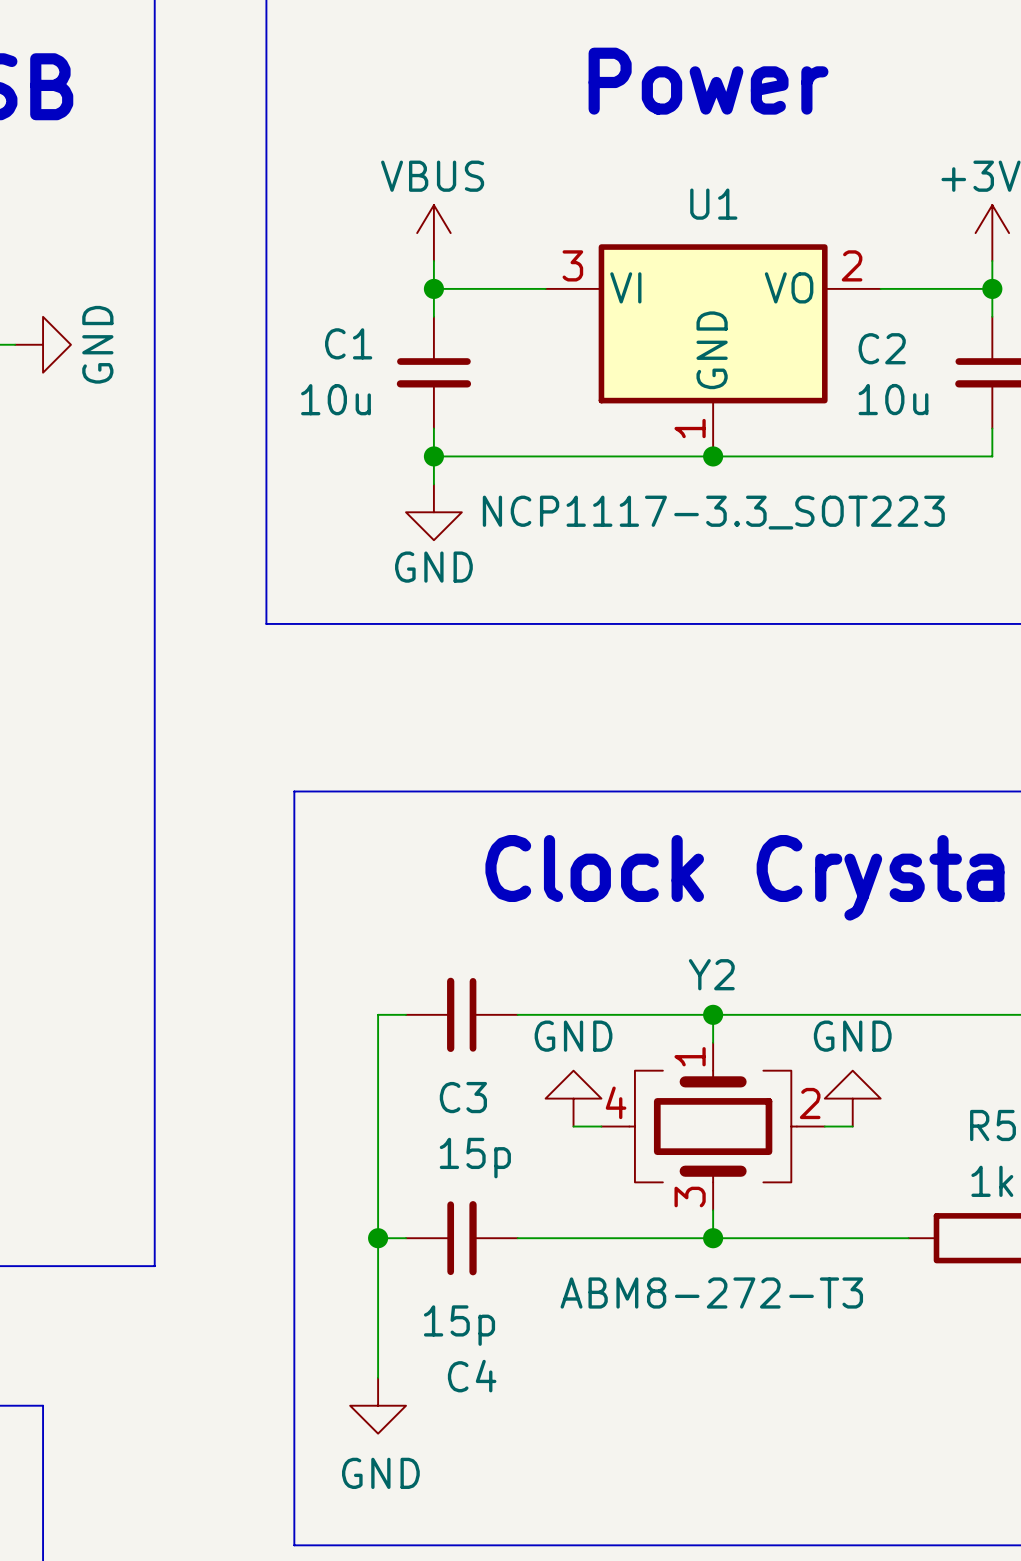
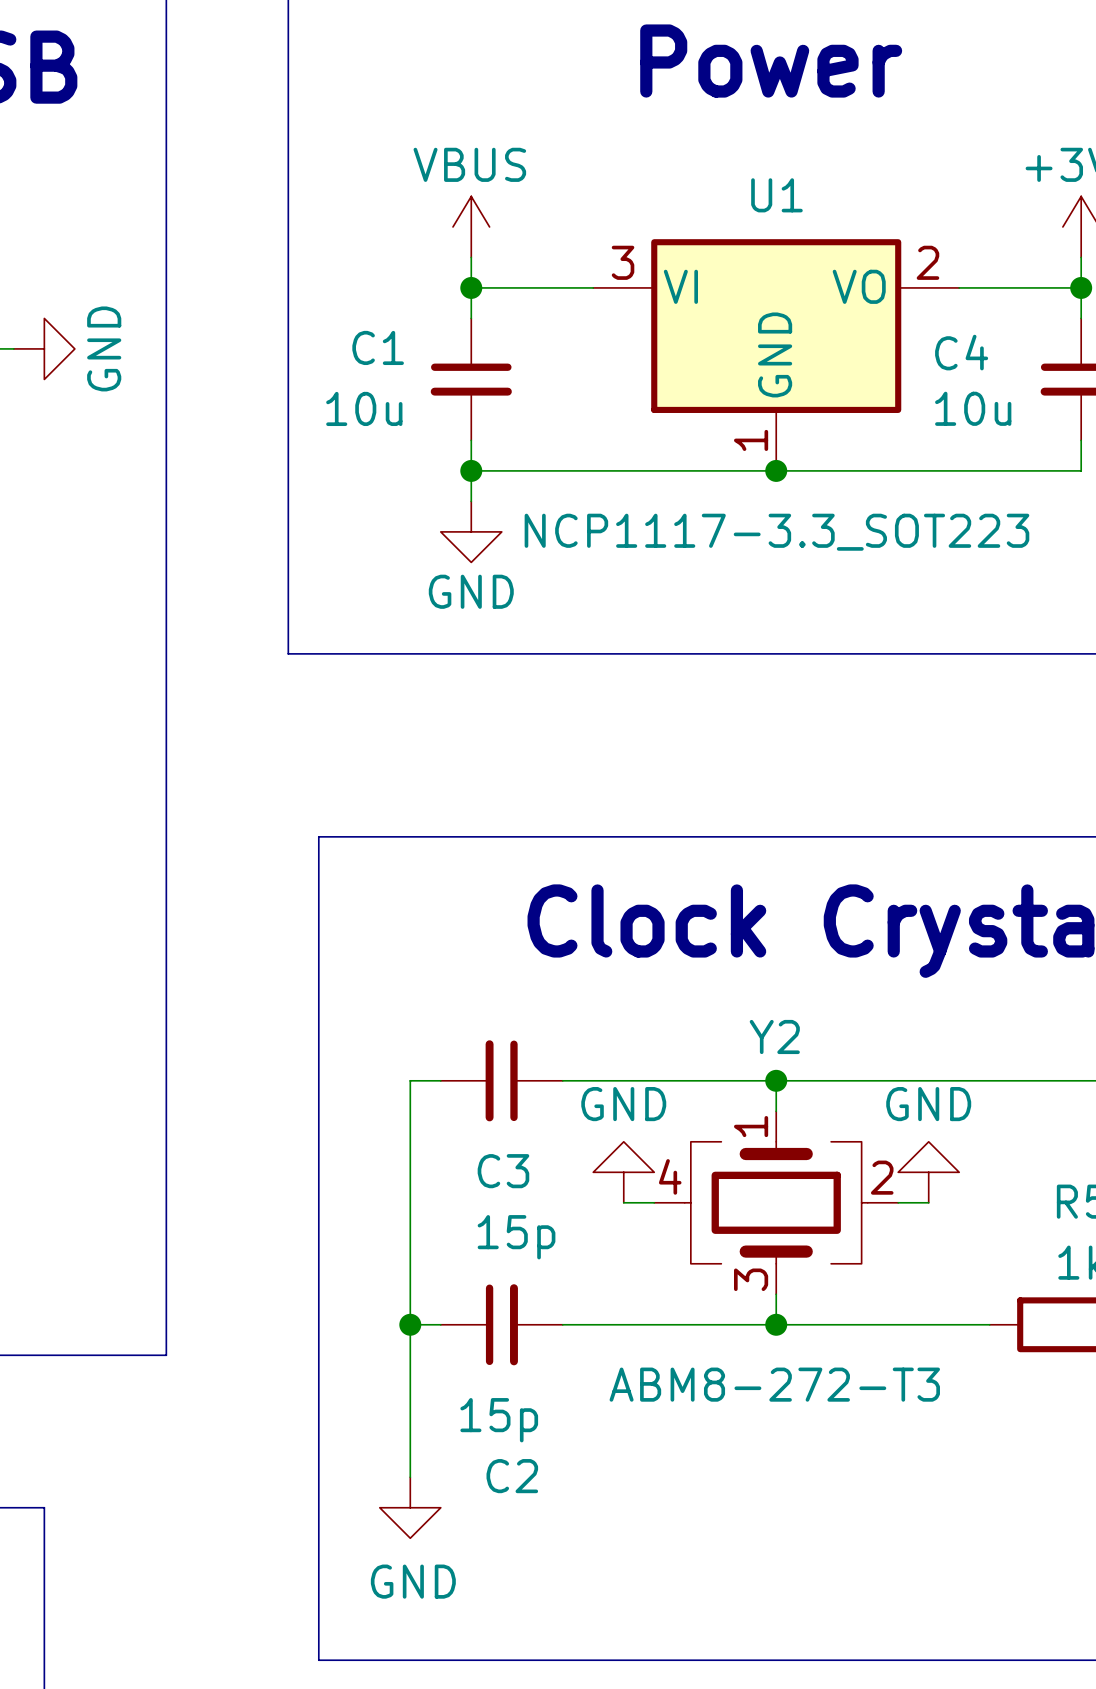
C2 name: C2 (882, 348) -> C4 (961, 352)
C4 name: C4 (472, 1376) -> C2 (512, 1476)

